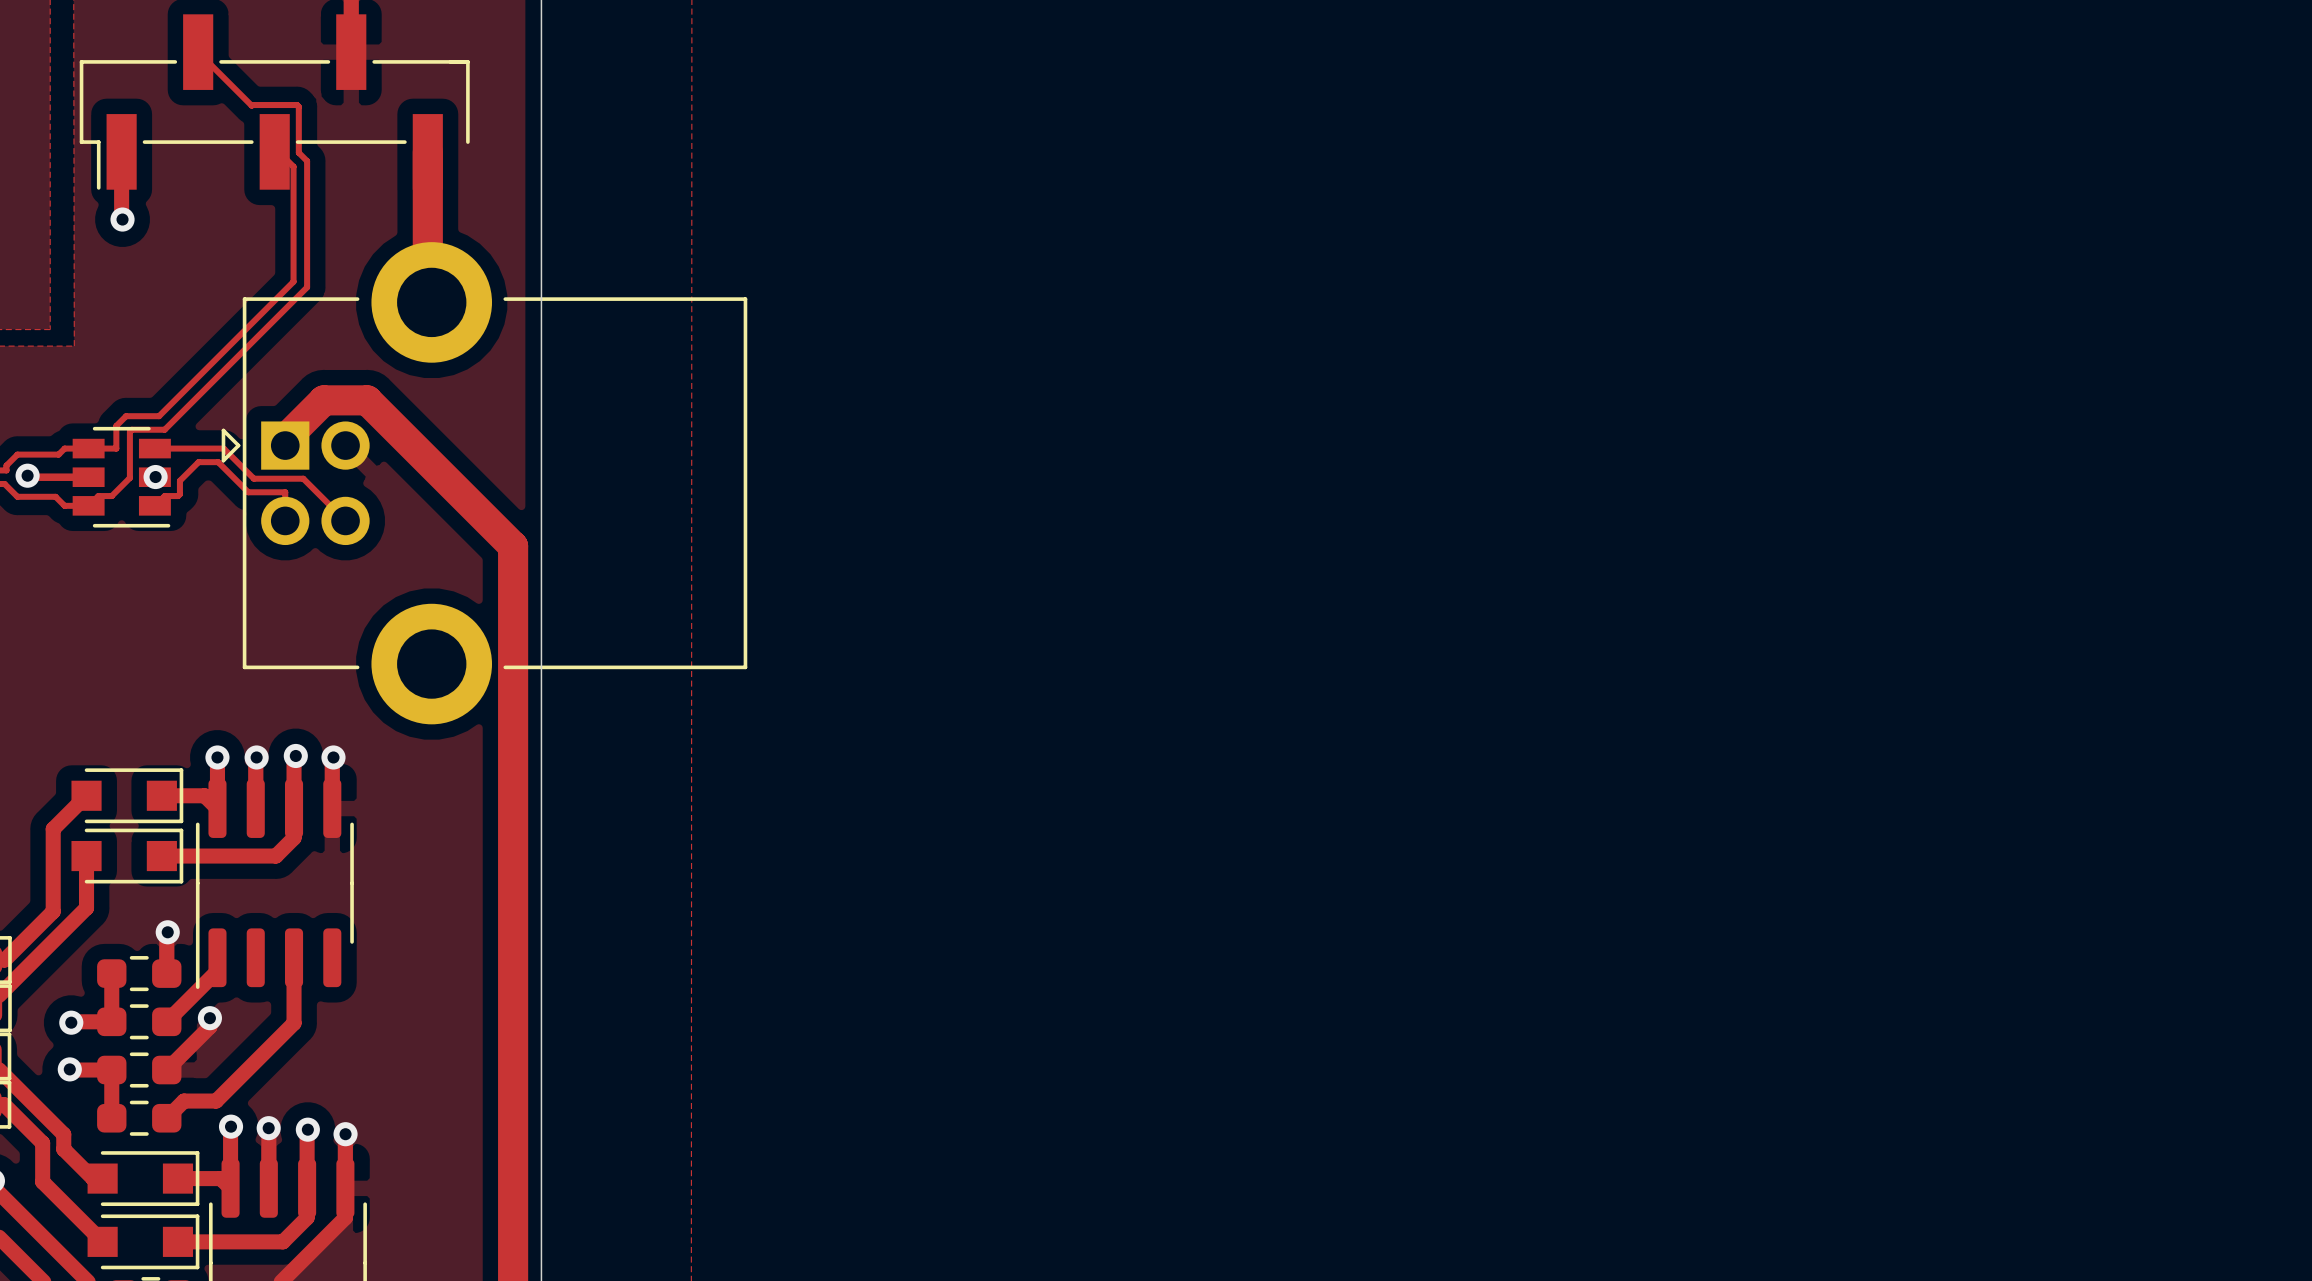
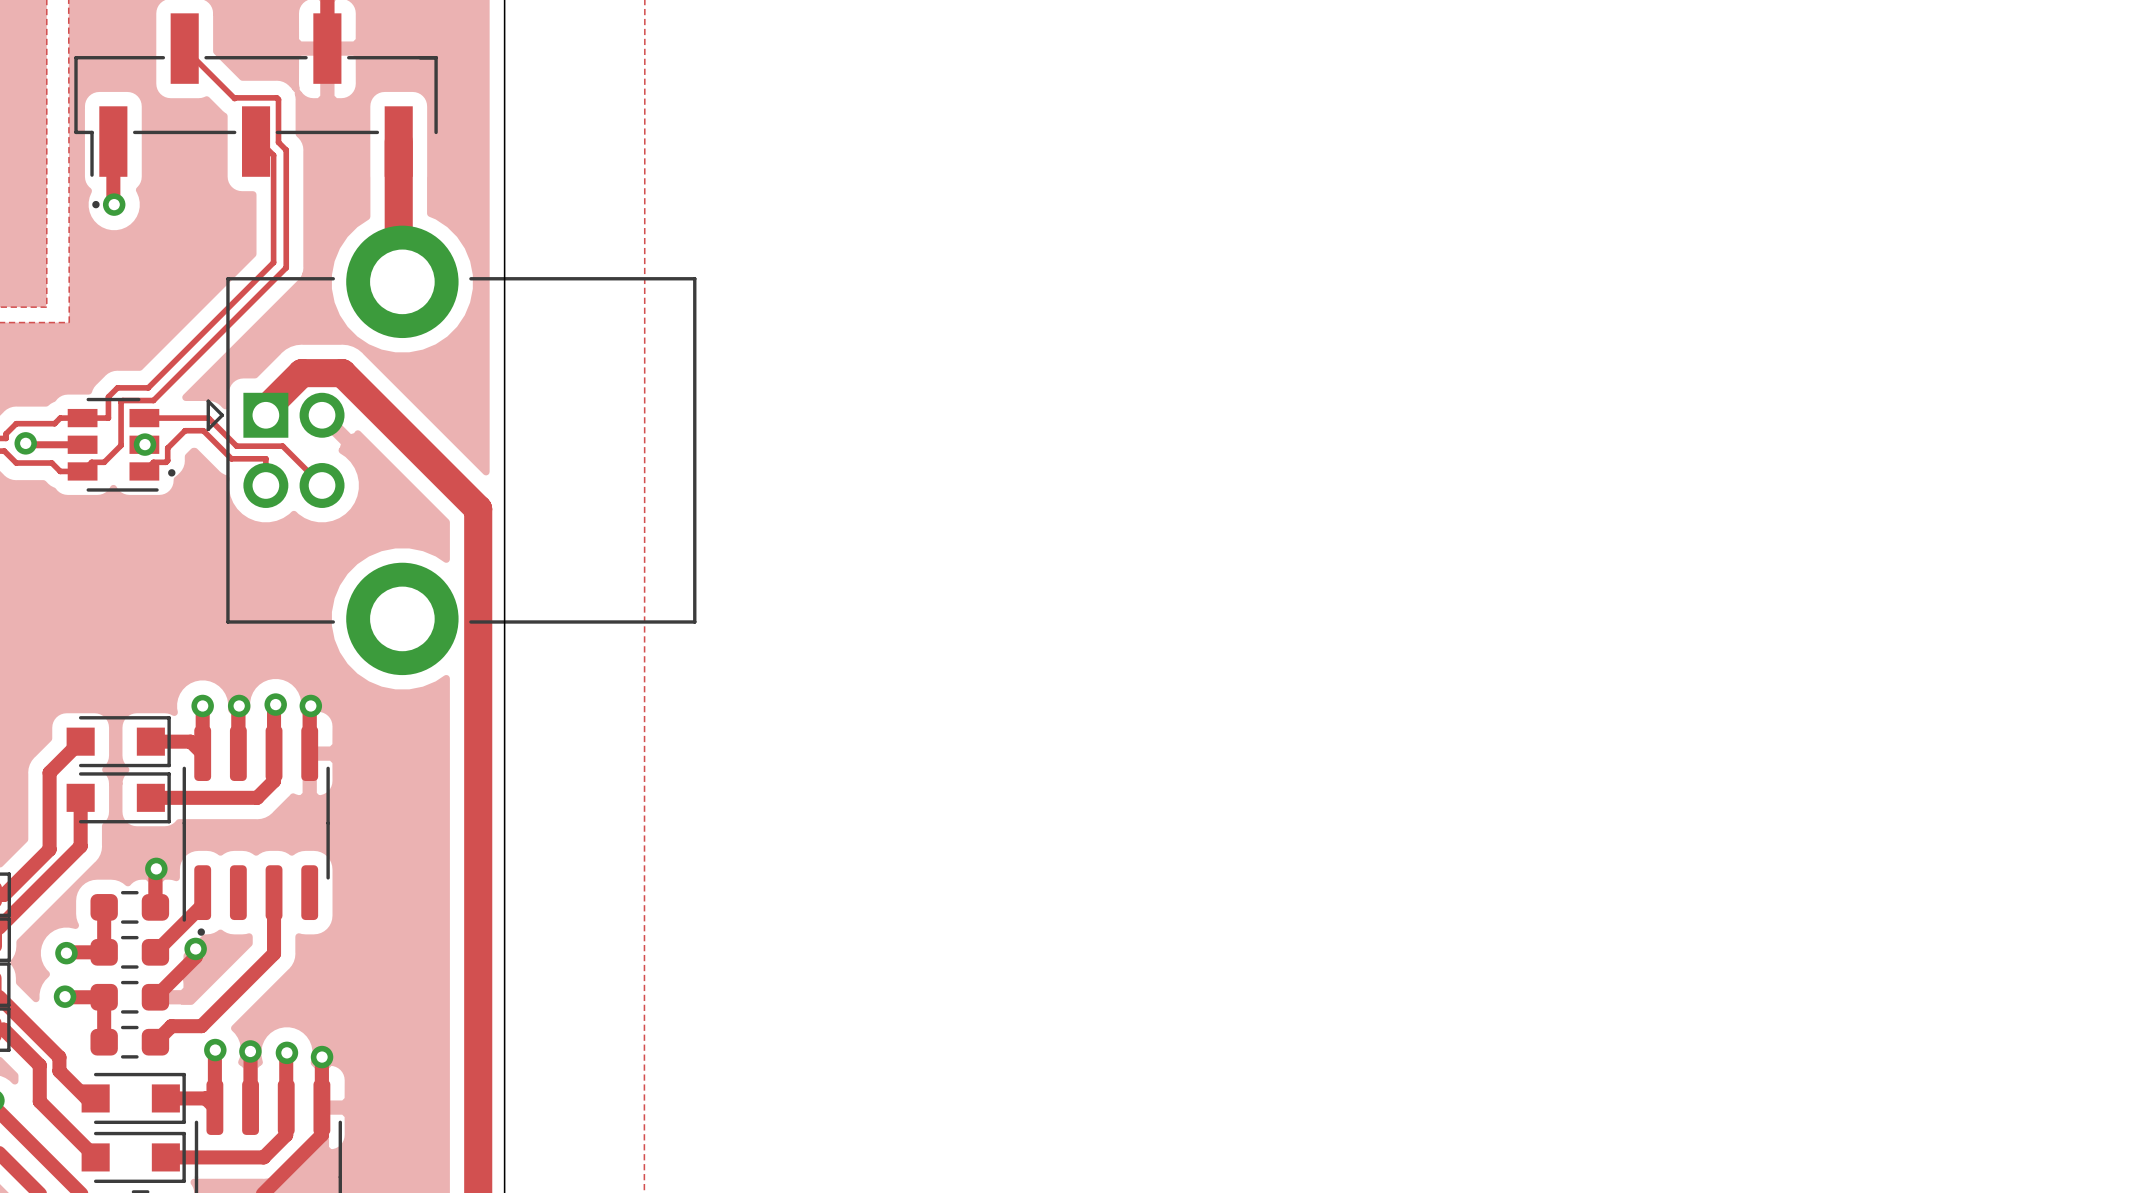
drawing: none -> [92, 200, 100, 209]
drawing: none -> [168, 469, 176, 477]
drawing: none -> [197, 928, 205, 936]

